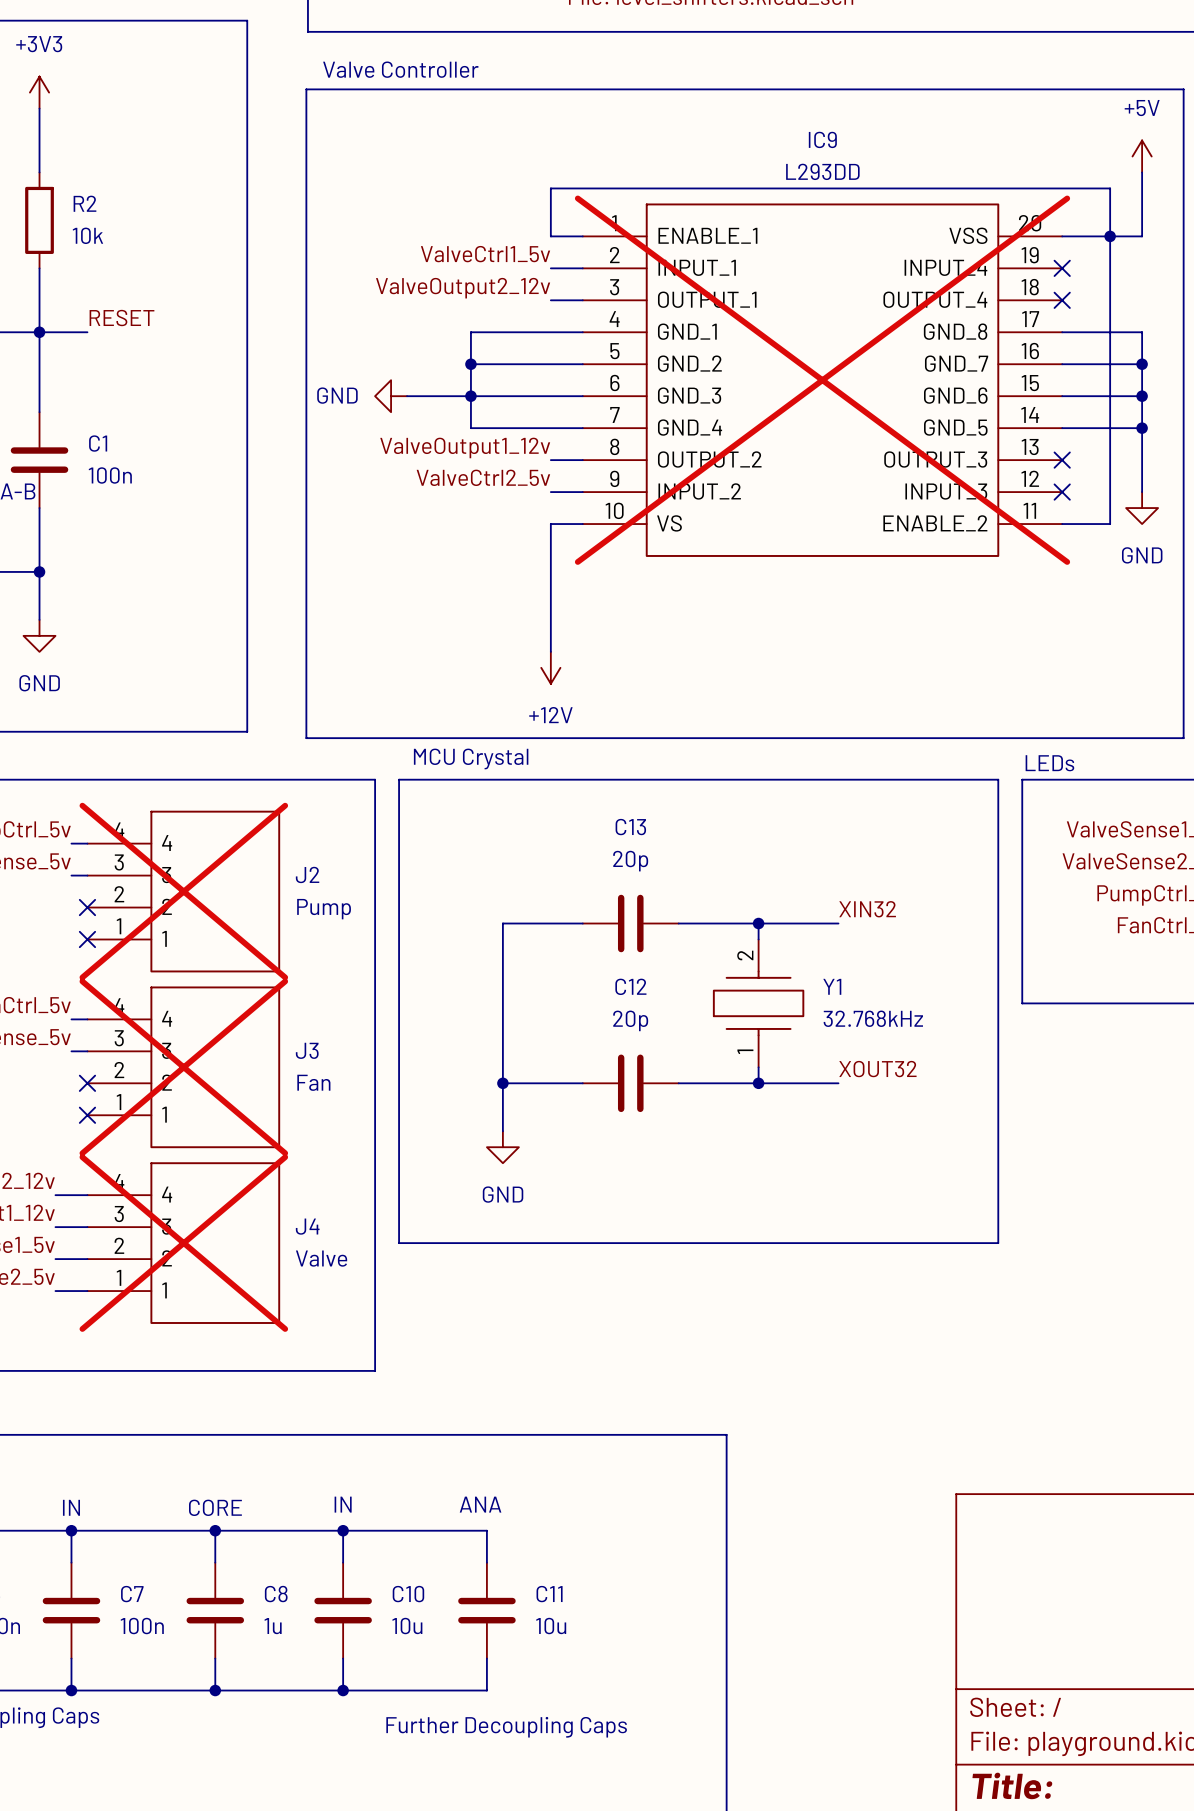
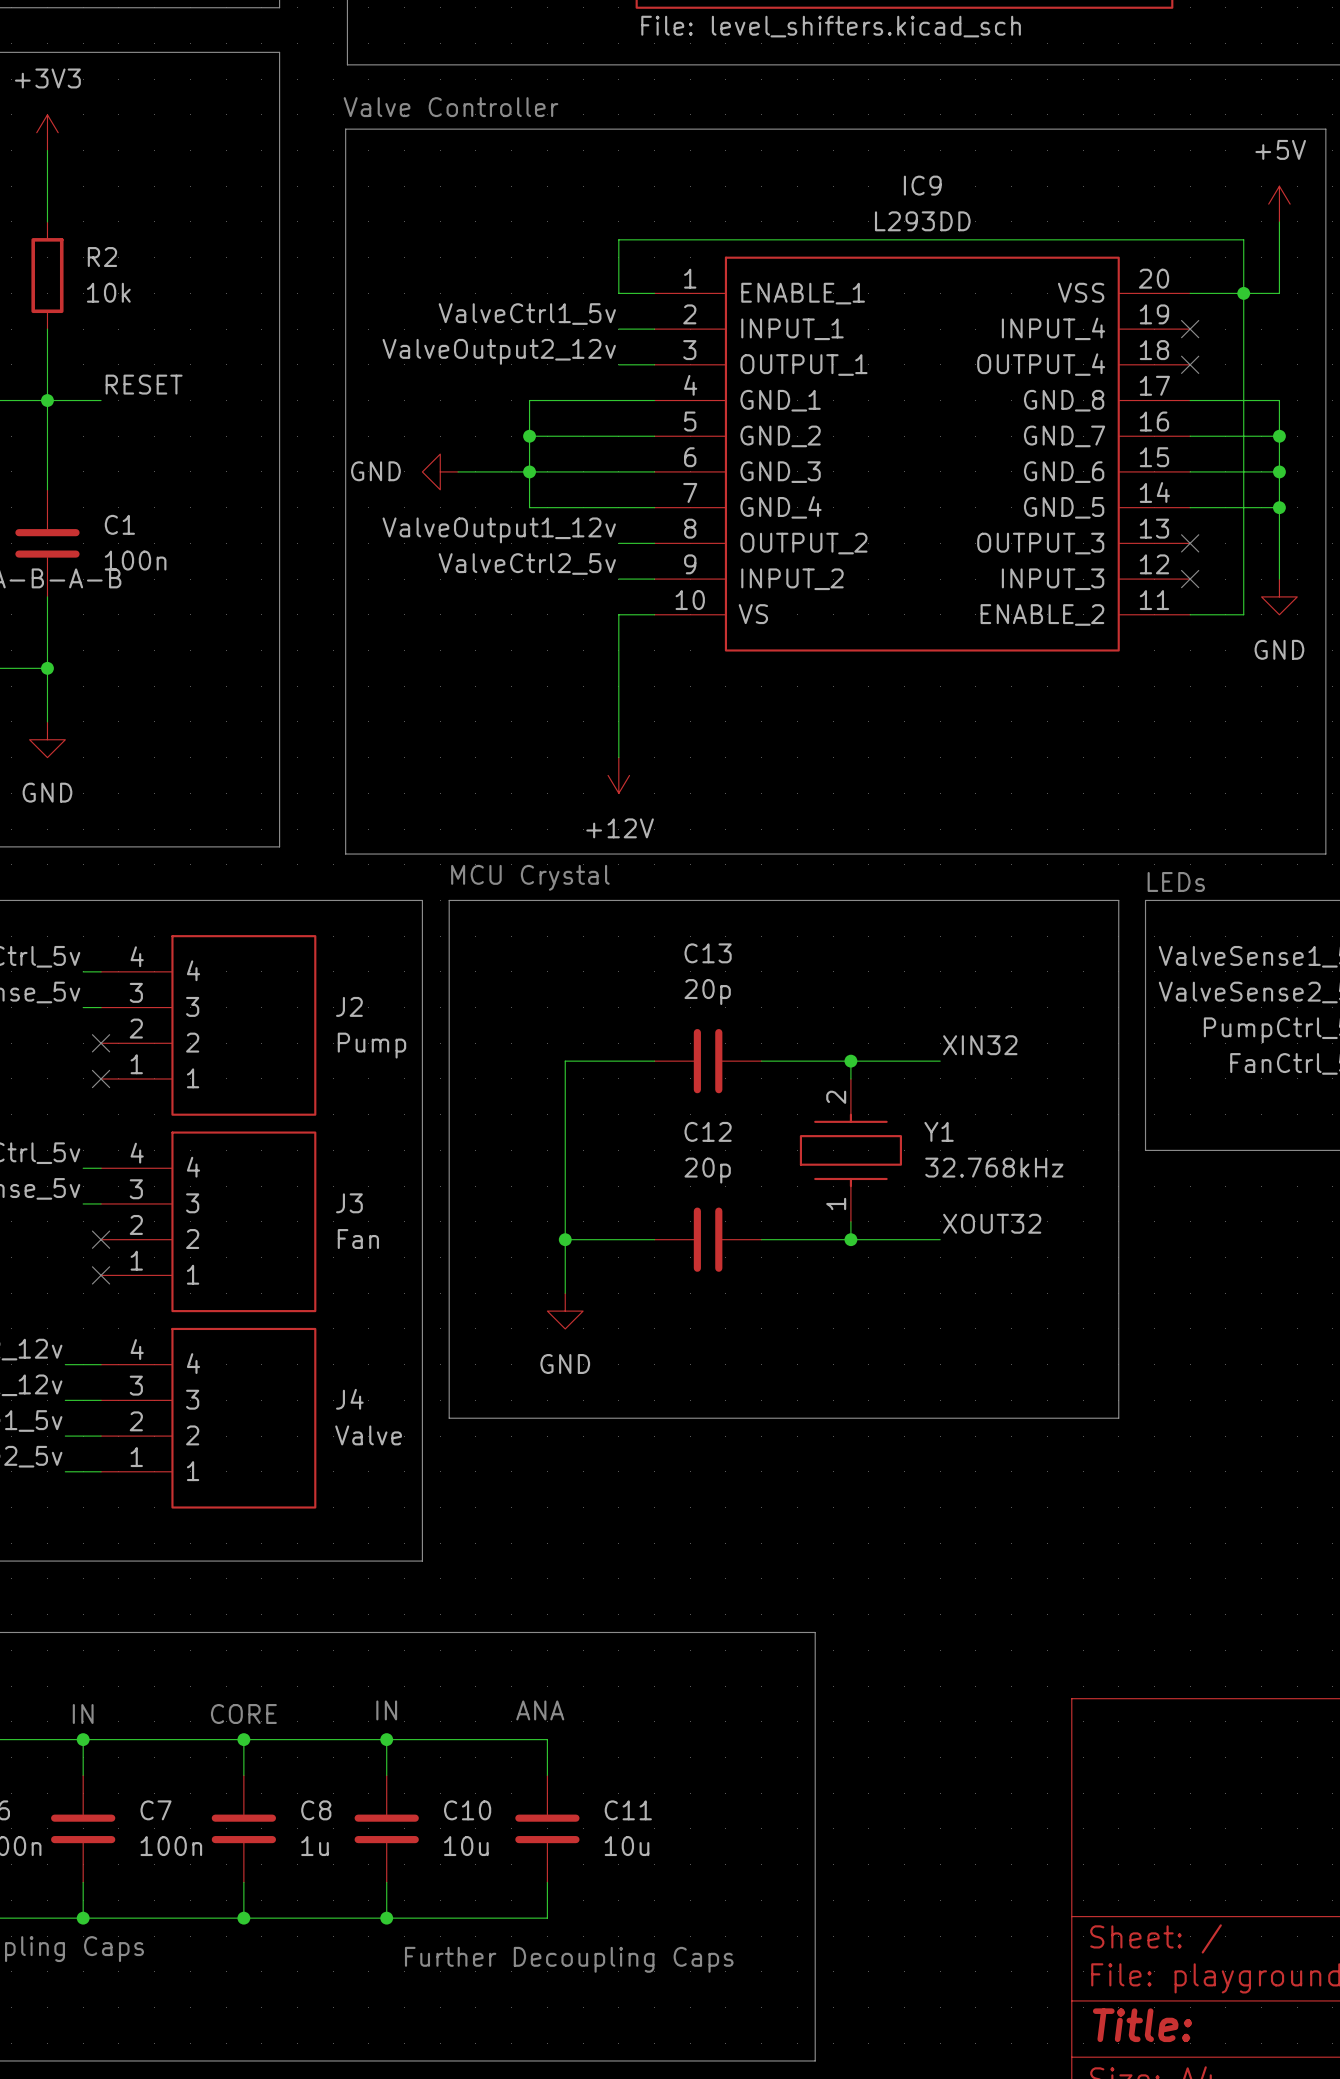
IC9 do-not-place cross: (822, 380) -> none
J2 do-not-place cross: (183, 891) -> none
J3 do-not-place cross: (183, 1067) -> none
J4 do-not-place cross: (183, 1243) -> none

